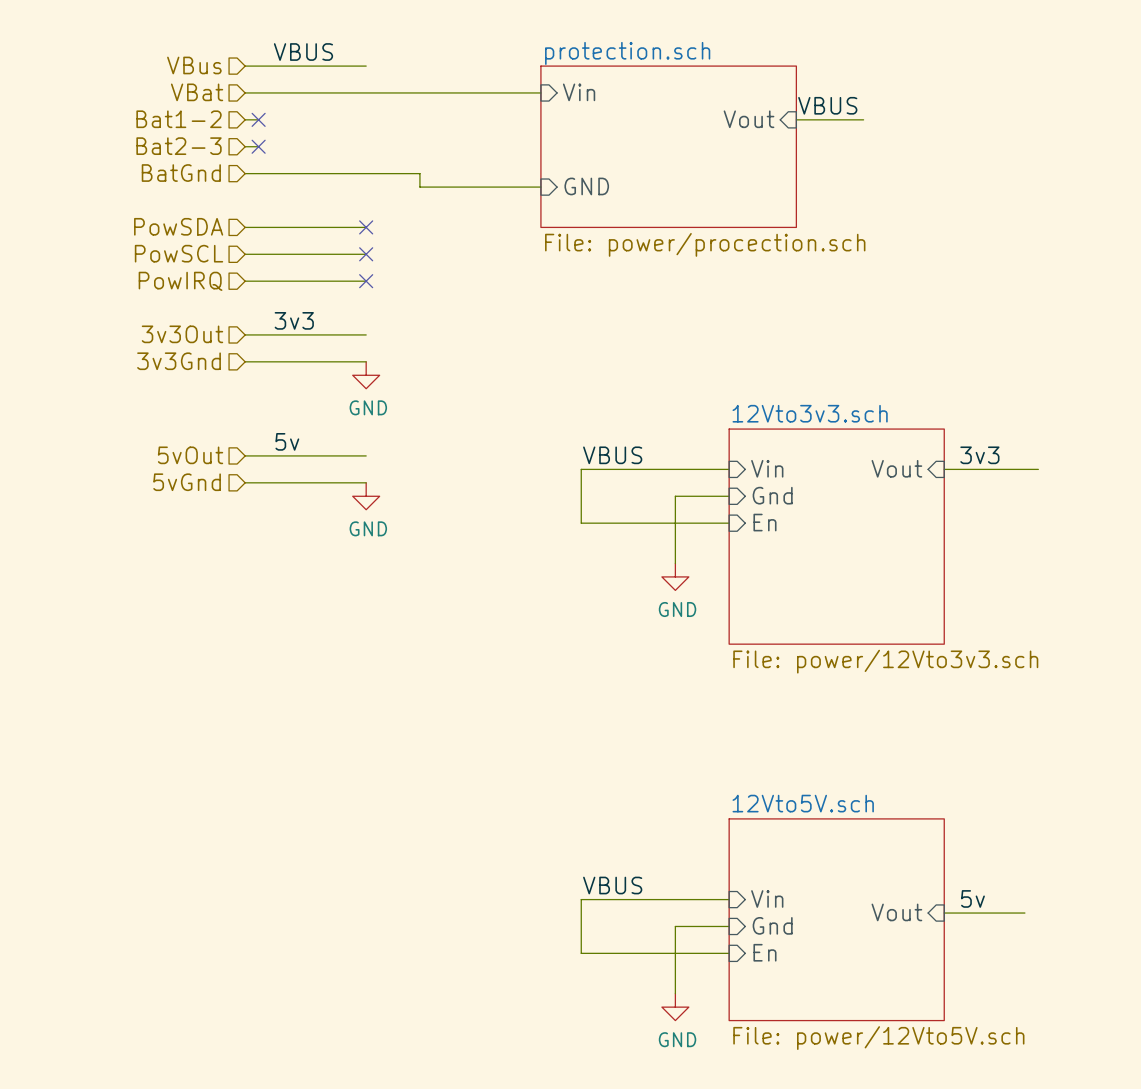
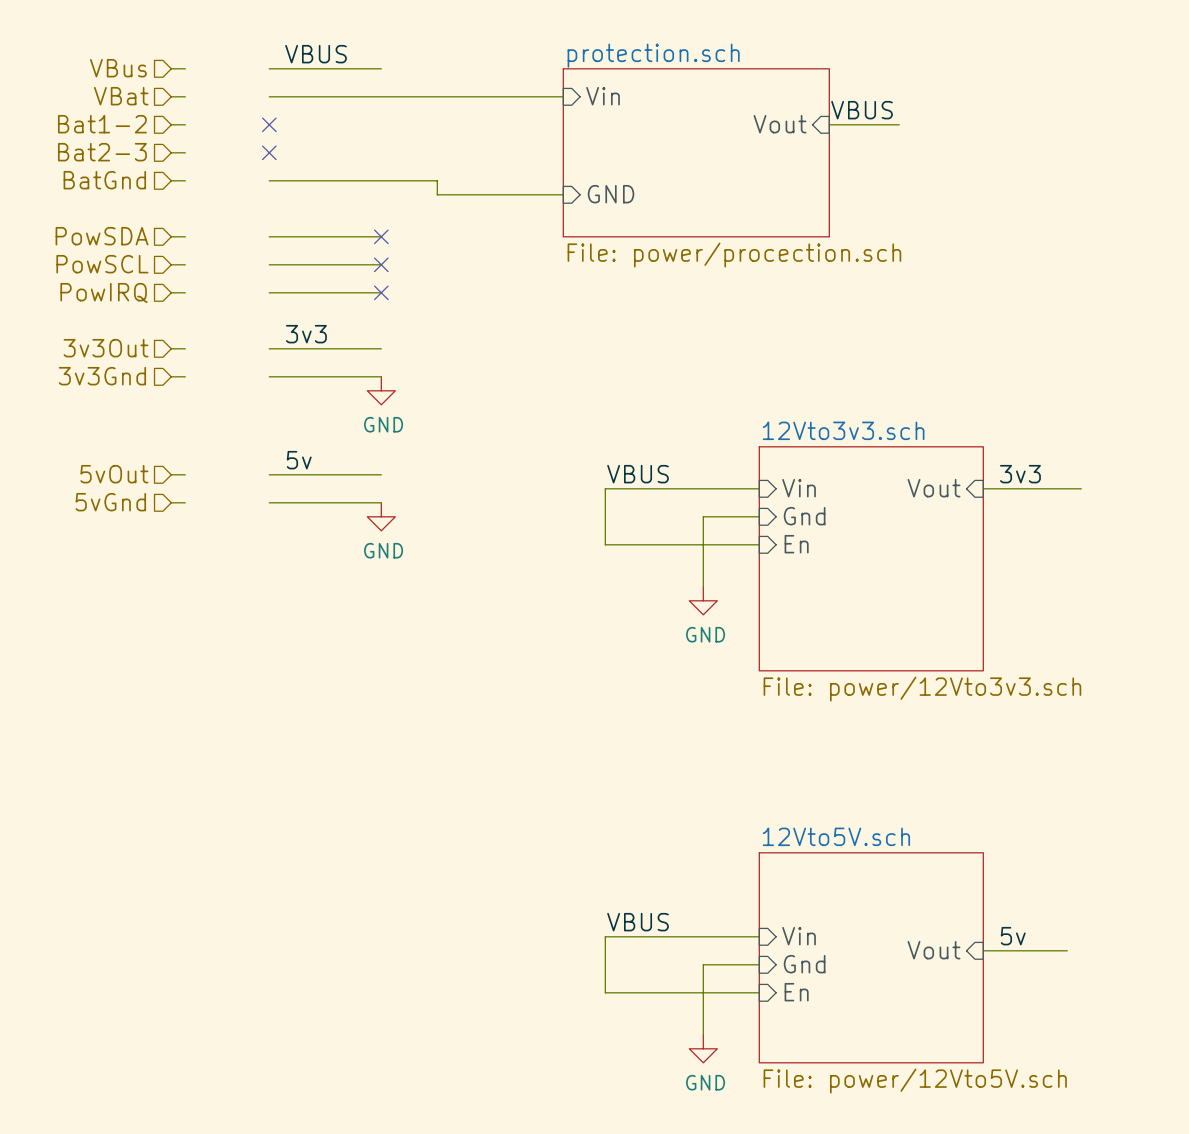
hierarchical label position: VBus (194, 65) -> VBus (118, 68)
wire: (245, 66) (258, 66) -> (171, 68) (185, 68)
hierarchical label position: VBat (197, 92) -> VBat (121, 96)
wire: (245, 92) (258, 92) -> (171, 96) (185, 96)
hierarchical label position: Bat1-2 (179, 119) -> Bat1-2 (102, 124)
wire: (245, 119) (258, 119) -> (171, 124) (185, 124)
hierarchical label position: Bat2-3 (179, 146) -> Bat2-3 (102, 152)
wire: (245, 146) (258, 146) -> (171, 152) (185, 152)
hierarchical label position: BatGnd (181, 173) -> BatGnd (104, 180)
wire: (245, 173) (258, 173) -> (171, 180) (185, 180)
hierarchical label position: PowSDA (178, 226) -> PowSDA (102, 236)
wire: (245, 227) (258, 227) -> (171, 236) (185, 236)
hierarchical label position: PowSCL (179, 253) -> PowSCL (102, 264)
wire: (245, 254) (258, 254) -> (171, 264) (185, 264)
hierarchical label position: PowIRQ (180, 281) -> PowIRQ (104, 292)
wire: (245, 281) (258, 281) -> (171, 292) (185, 292)
hierarchical label position: 3v3Out (182, 334) -> 3v3Out (106, 348)
wire: (245, 334) (258, 334) -> (171, 348) (185, 348)
hierarchical label position: 3v3Gnd (179, 361) -> 3v3Gnd (102, 376)
wire: (245, 361) (258, 361) -> (171, 376) (185, 376)
hierarchical label position: 5vOut (190, 455) -> 5vOut (114, 474)
wire: (245, 455) (258, 455) -> (171, 474) (185, 474)
hierarchical label position: 5vGnd (187, 482) -> 5vGnd (110, 502)
wire: (245, 482) (258, 482) -> (171, 502) (185, 502)

